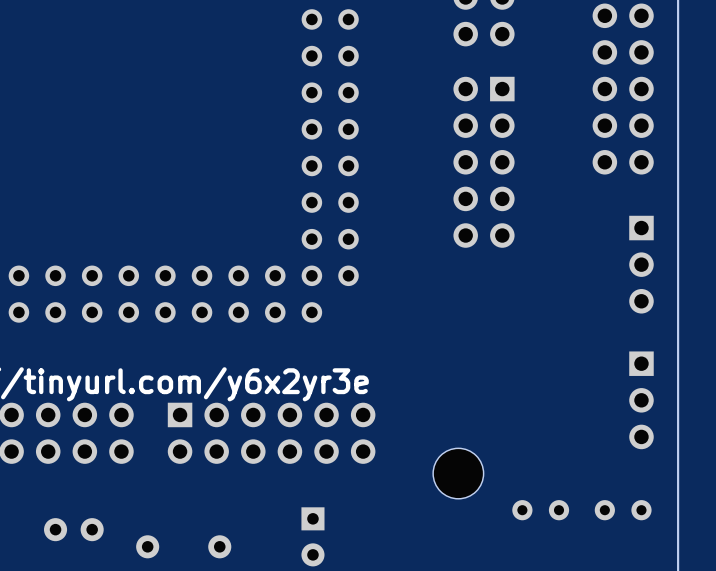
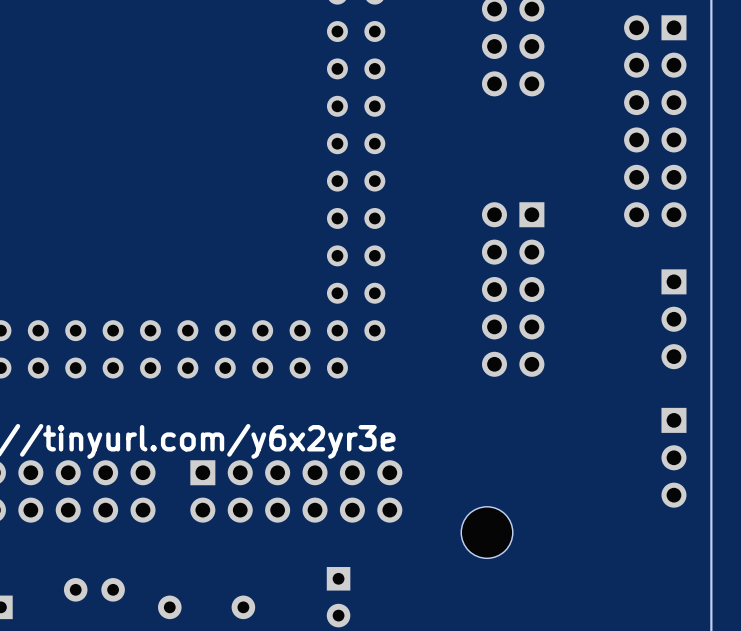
part position: (484, 162) -> (513, 289)
part: (540, 510) -> none
part: (623, 510) -> none

